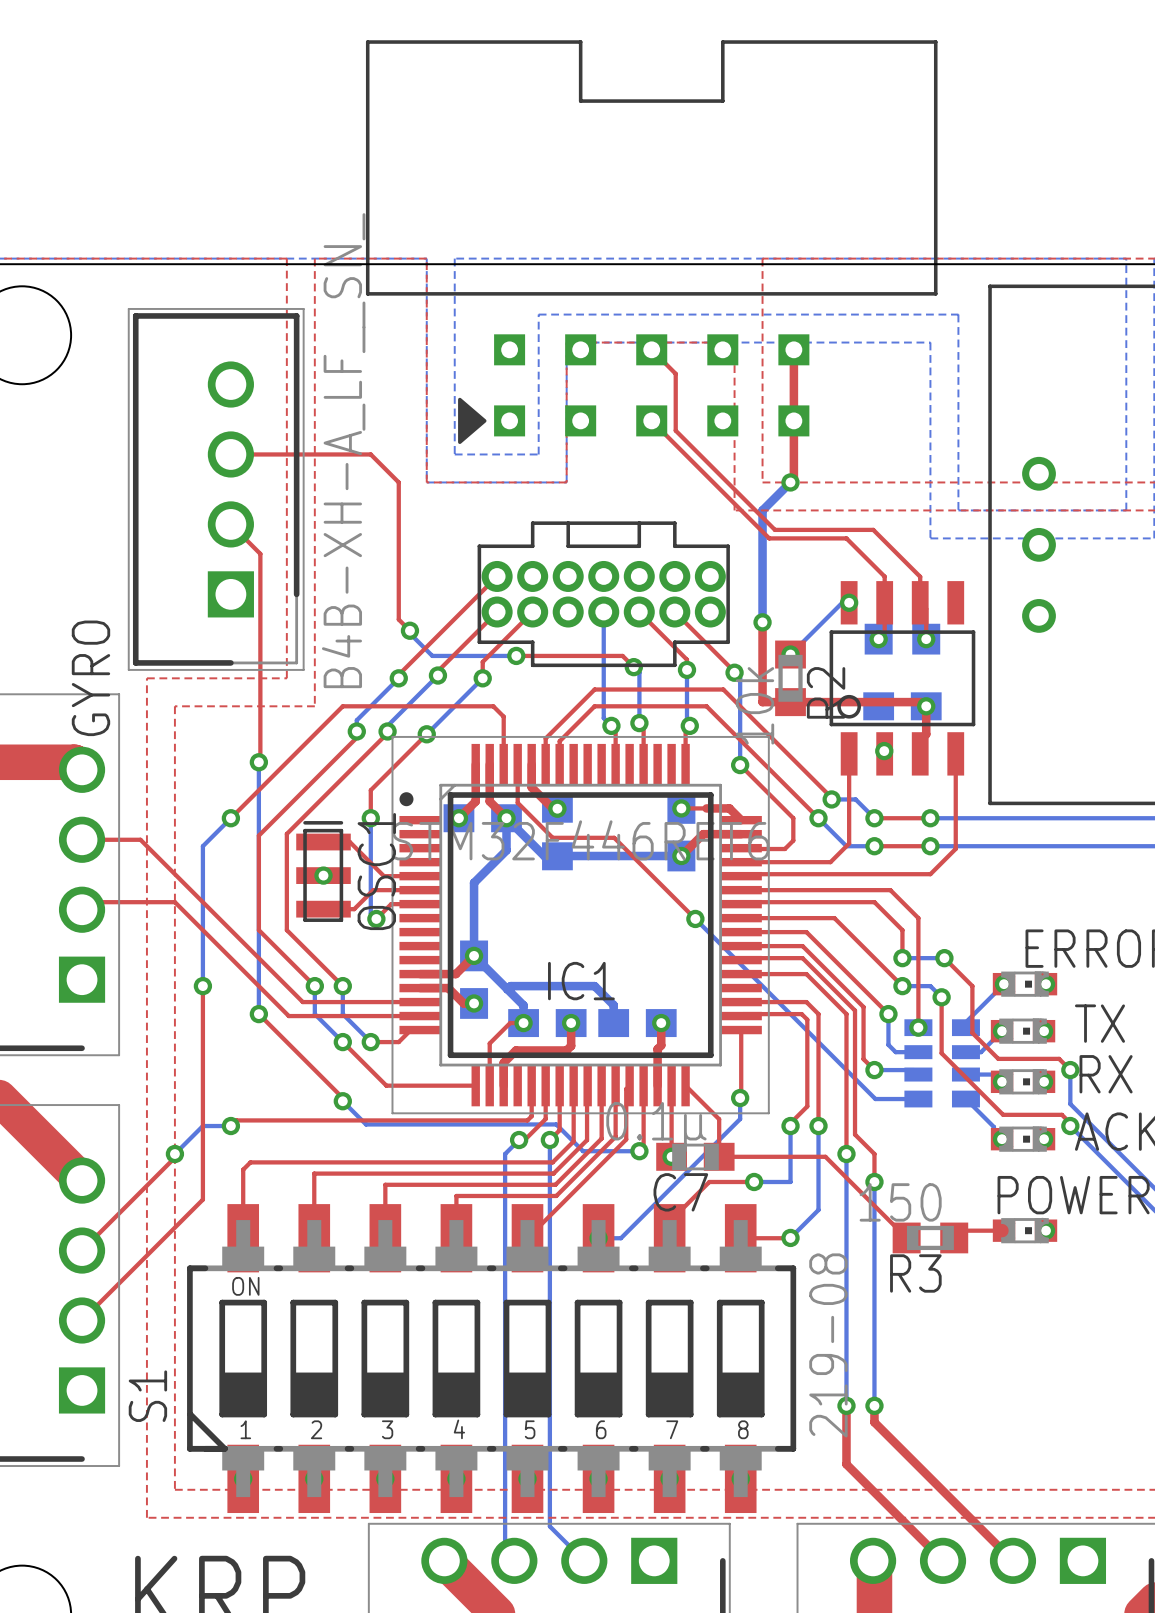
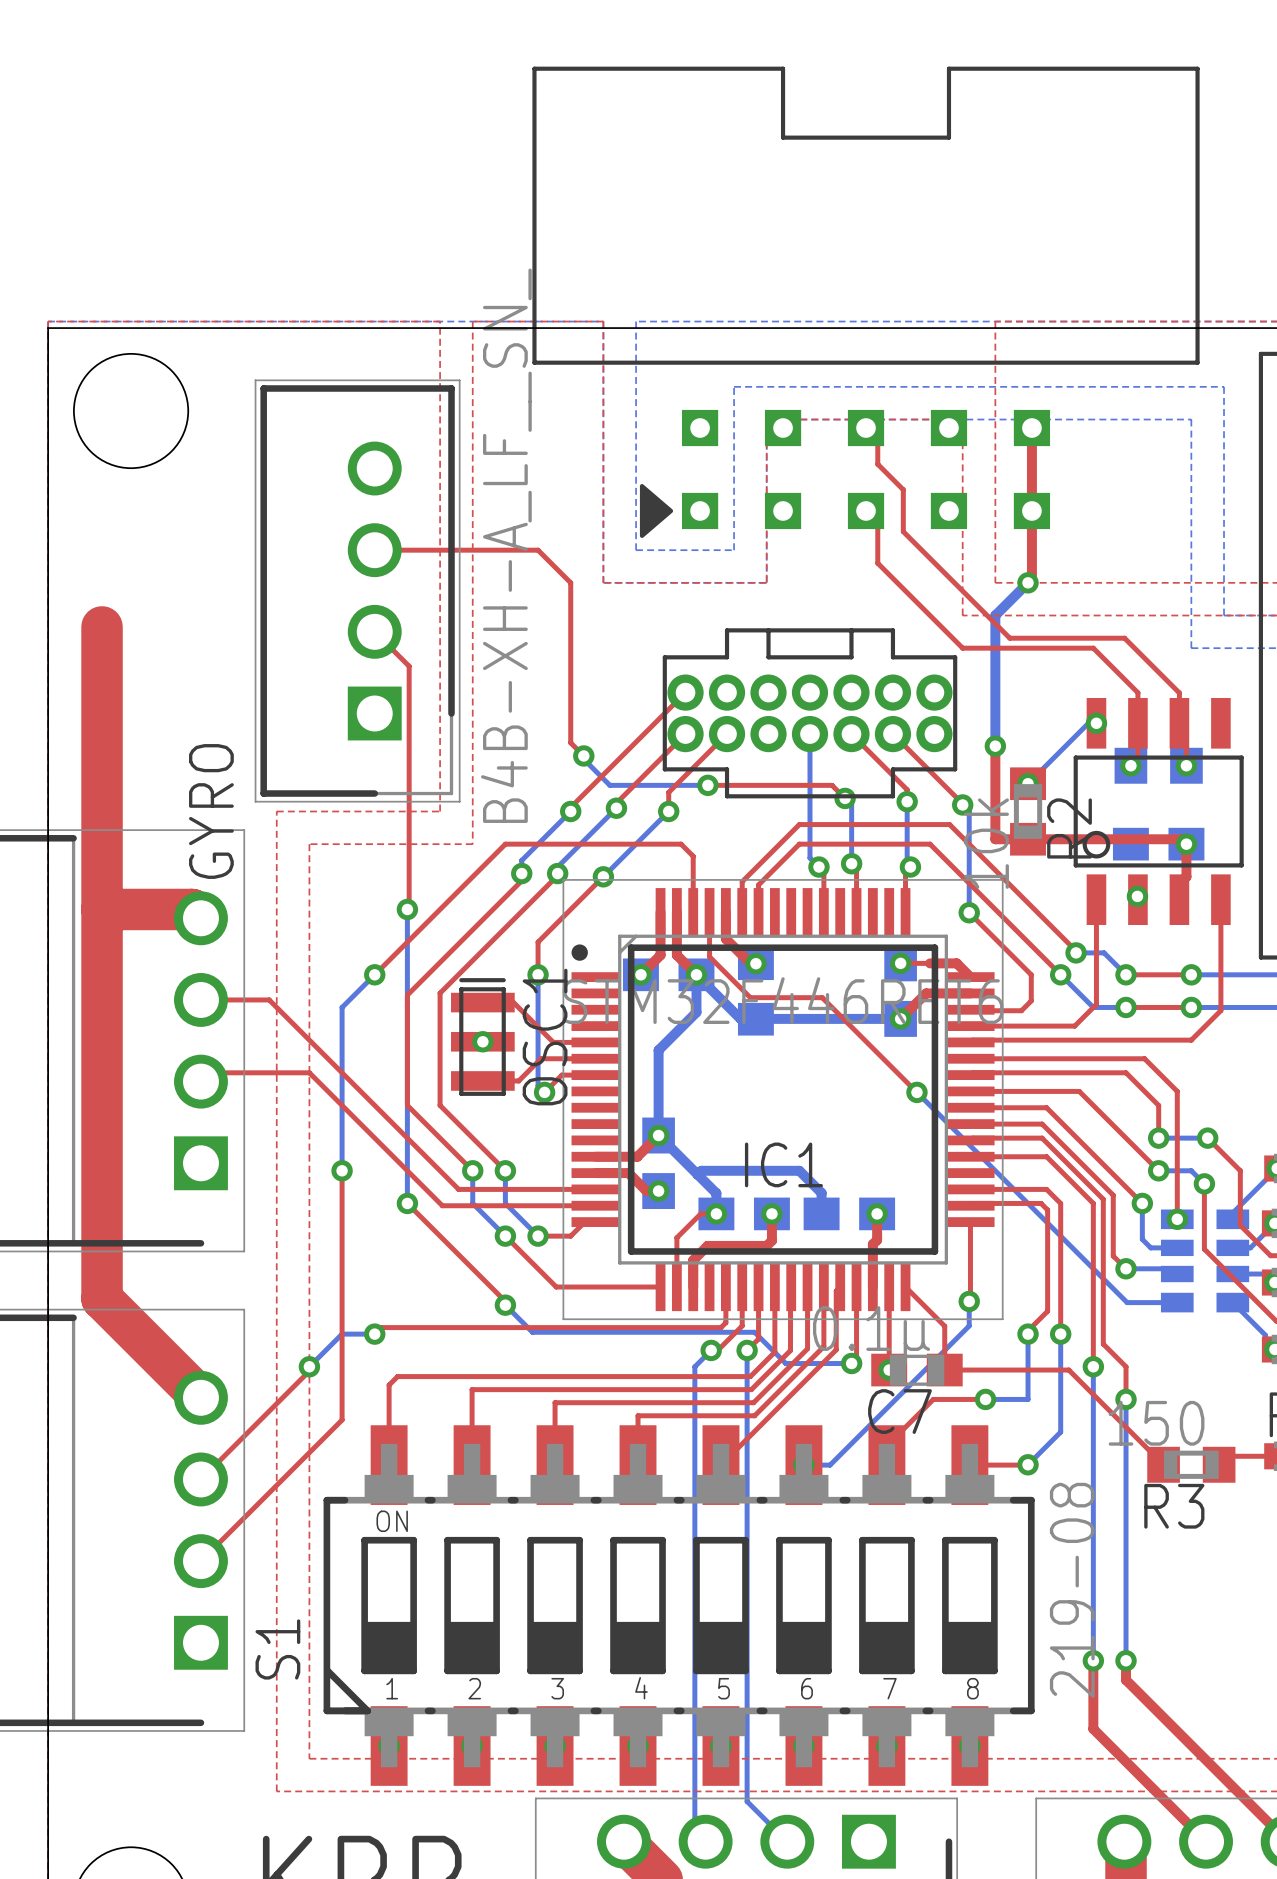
top track: (651, 349) (675, 373) (675, 430) (683, 438) -> (877, 428) (877, 464) (903, 489) (903, 531)
top track: (651, 420) (769, 538) -> (877, 510) (877, 563) (962, 648) (1003, 648)

